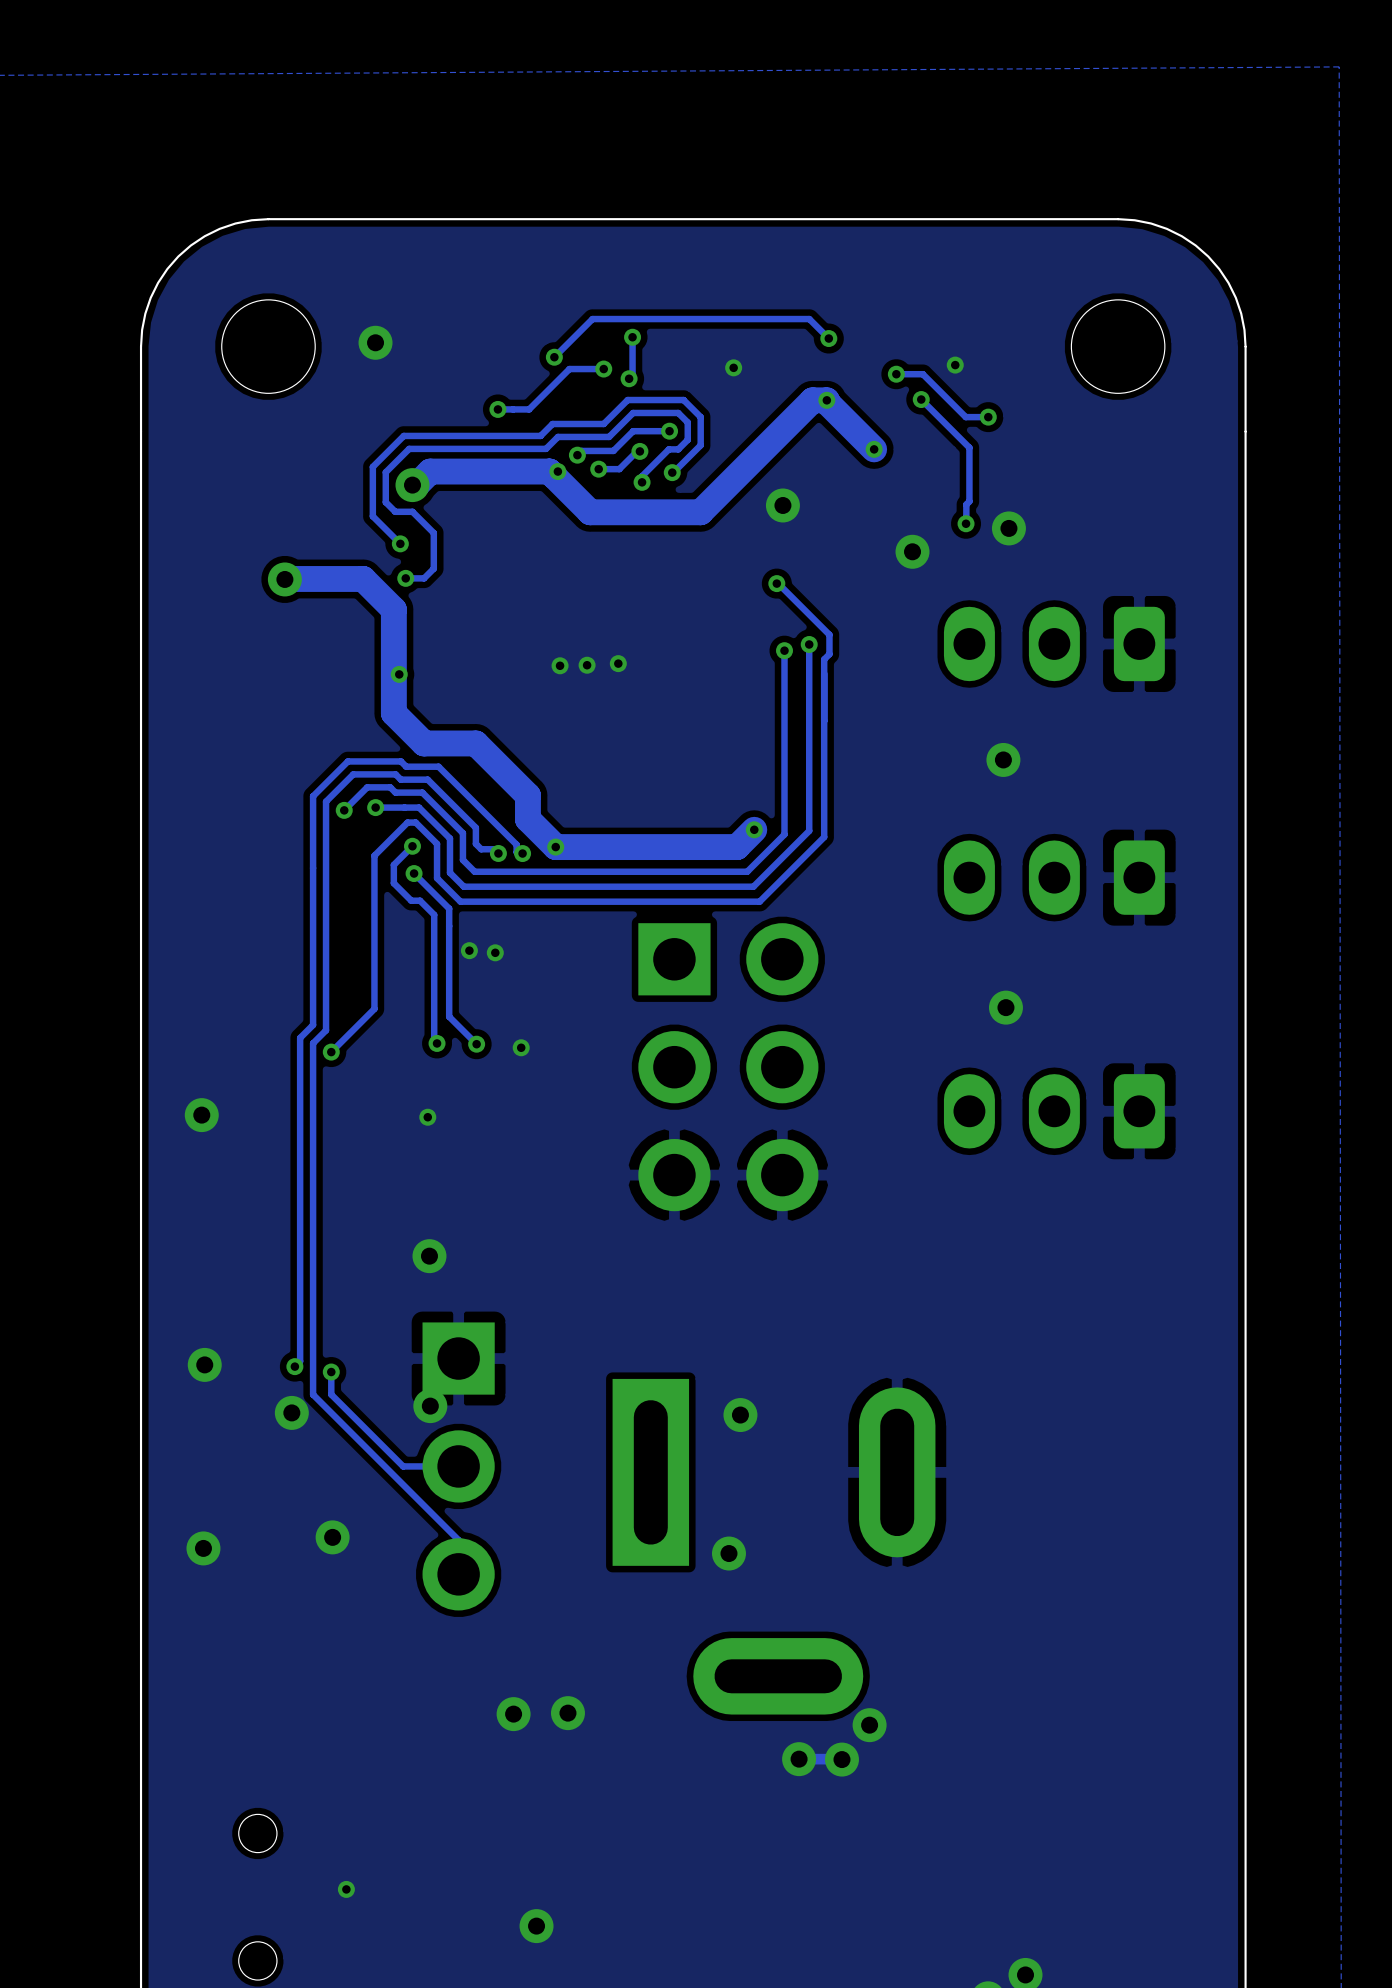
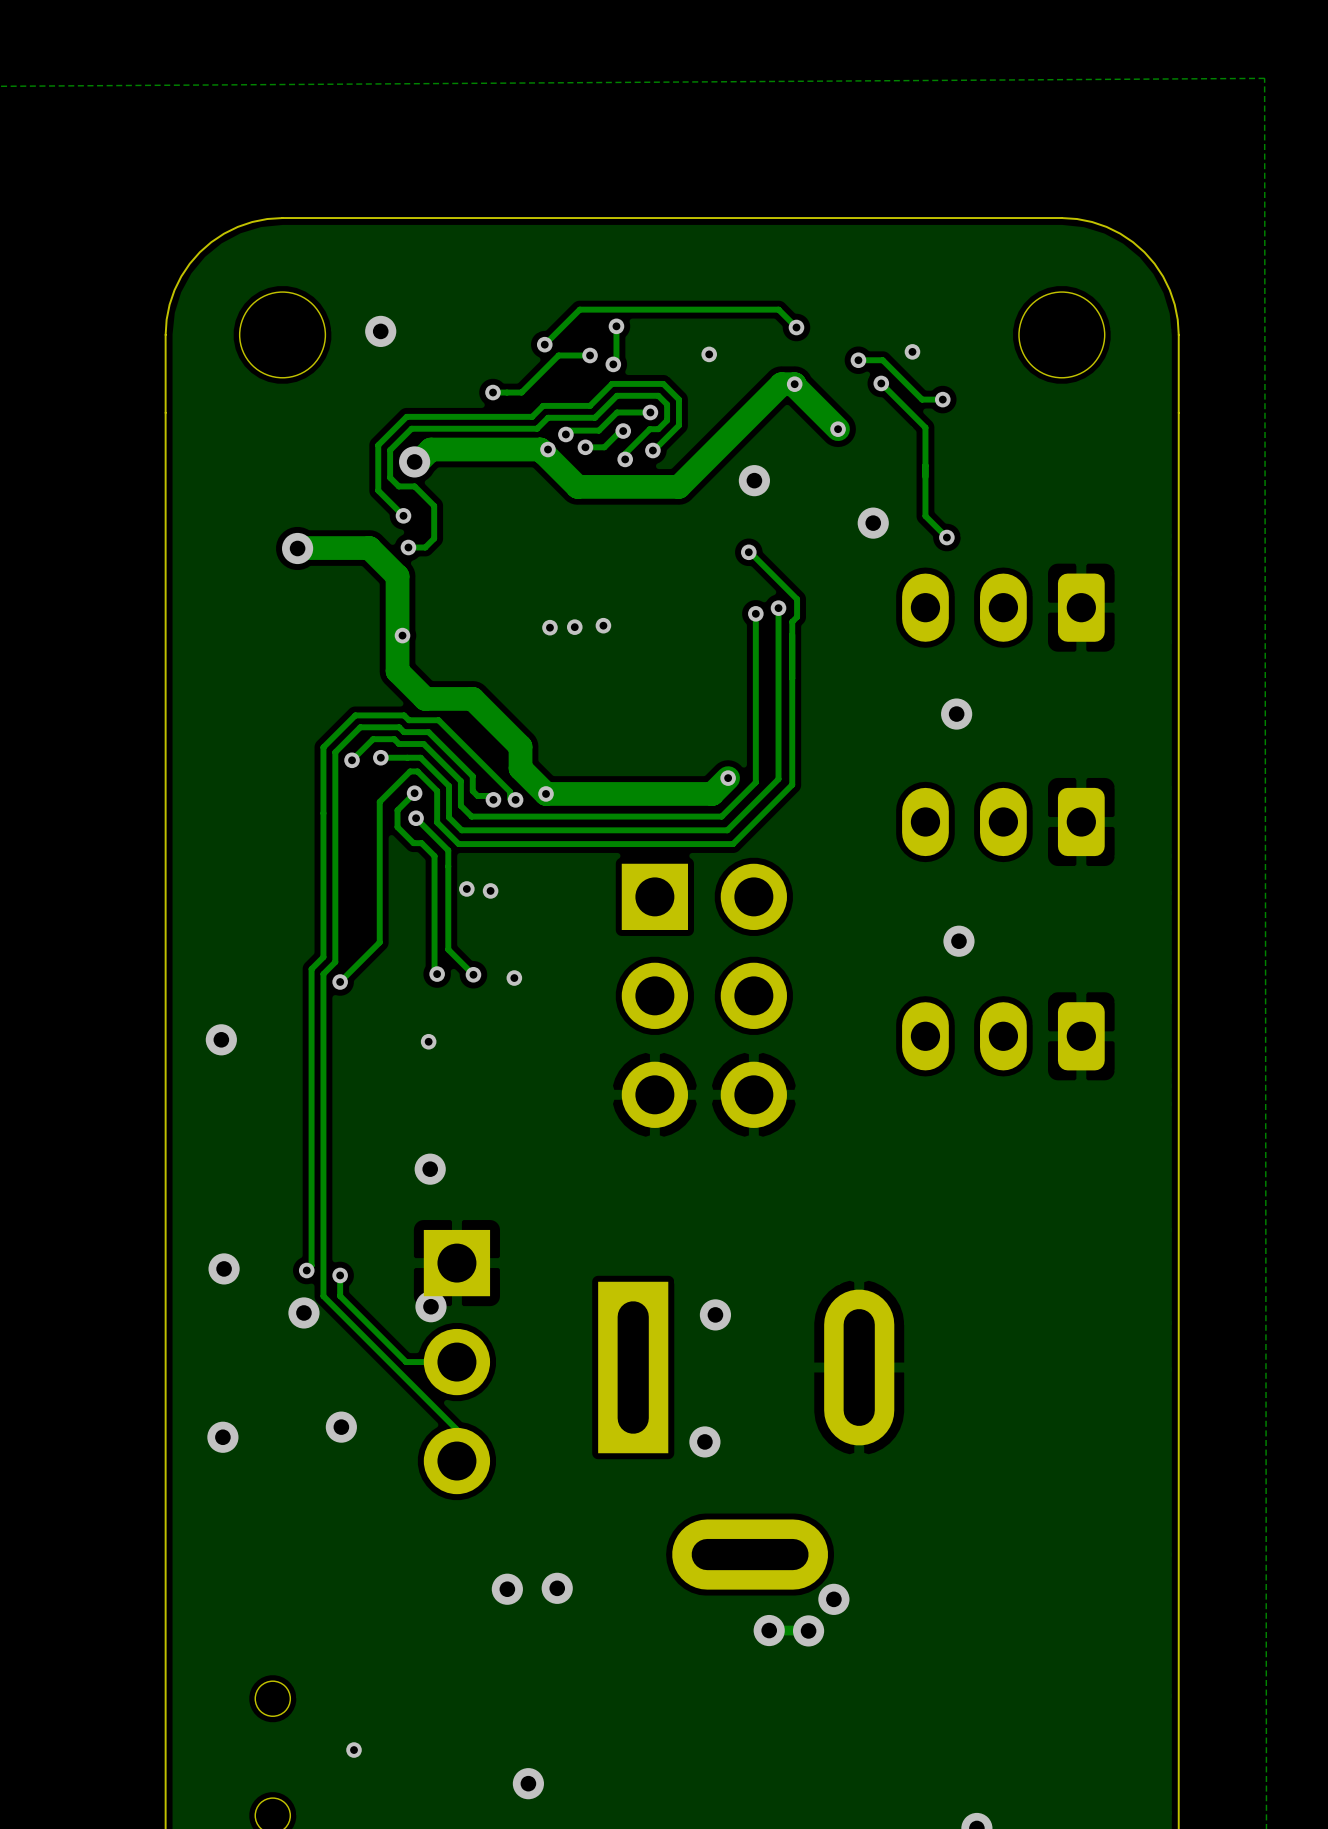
track: (969, 501) (966, 504) (966, 517) -> (925, 476) (925, 516) (946, 537)
via position: (966, 523) -> (946, 537)
via: (1008, 528) -> none

